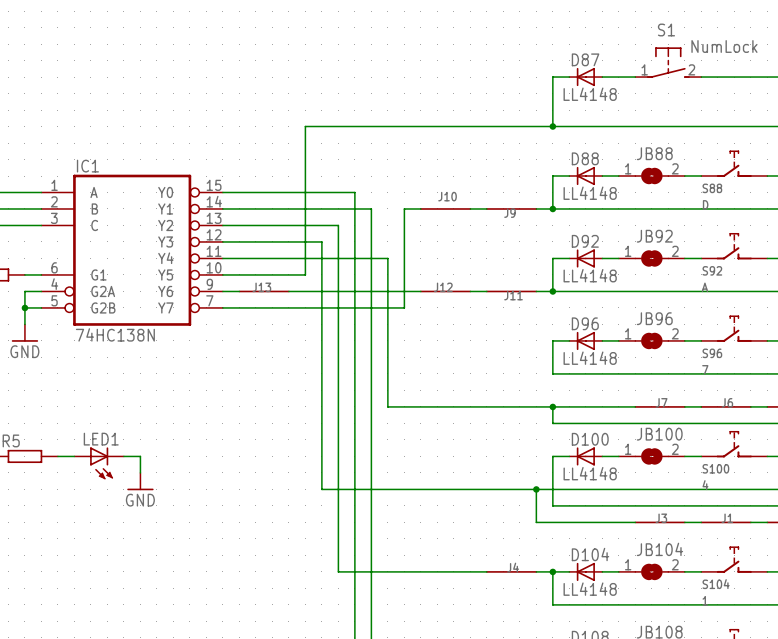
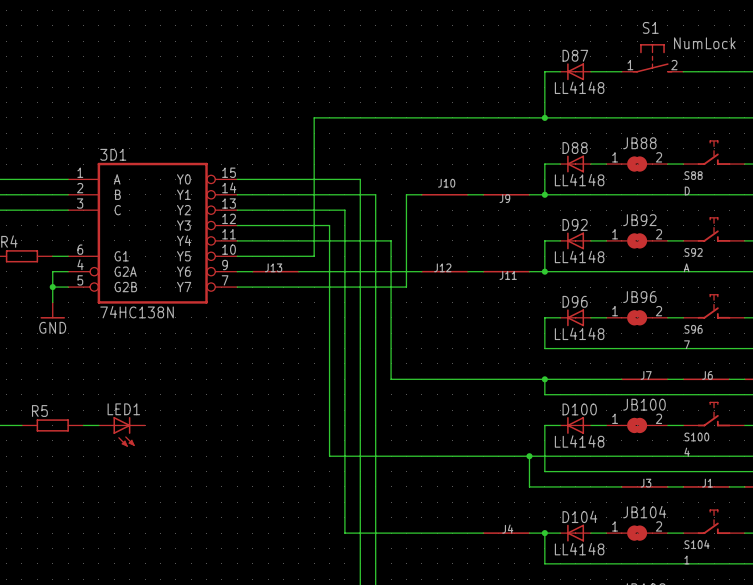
IC1 name: IC1 (87, 166) -> 3D1 (113, 154)
wire: (123, 456) (140, 456) (140, 472) -> none
power symbol: GND (140, 481) -> none

